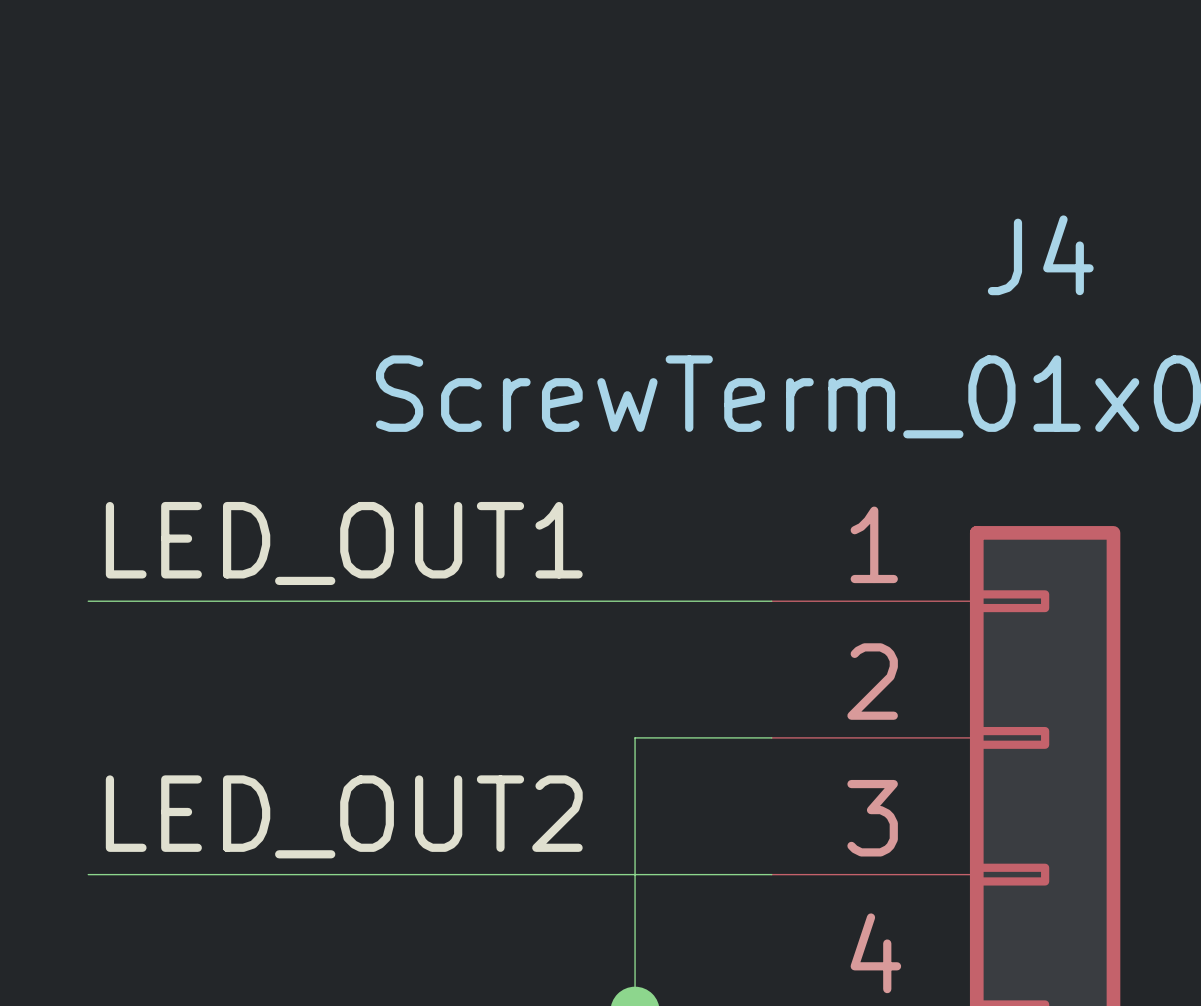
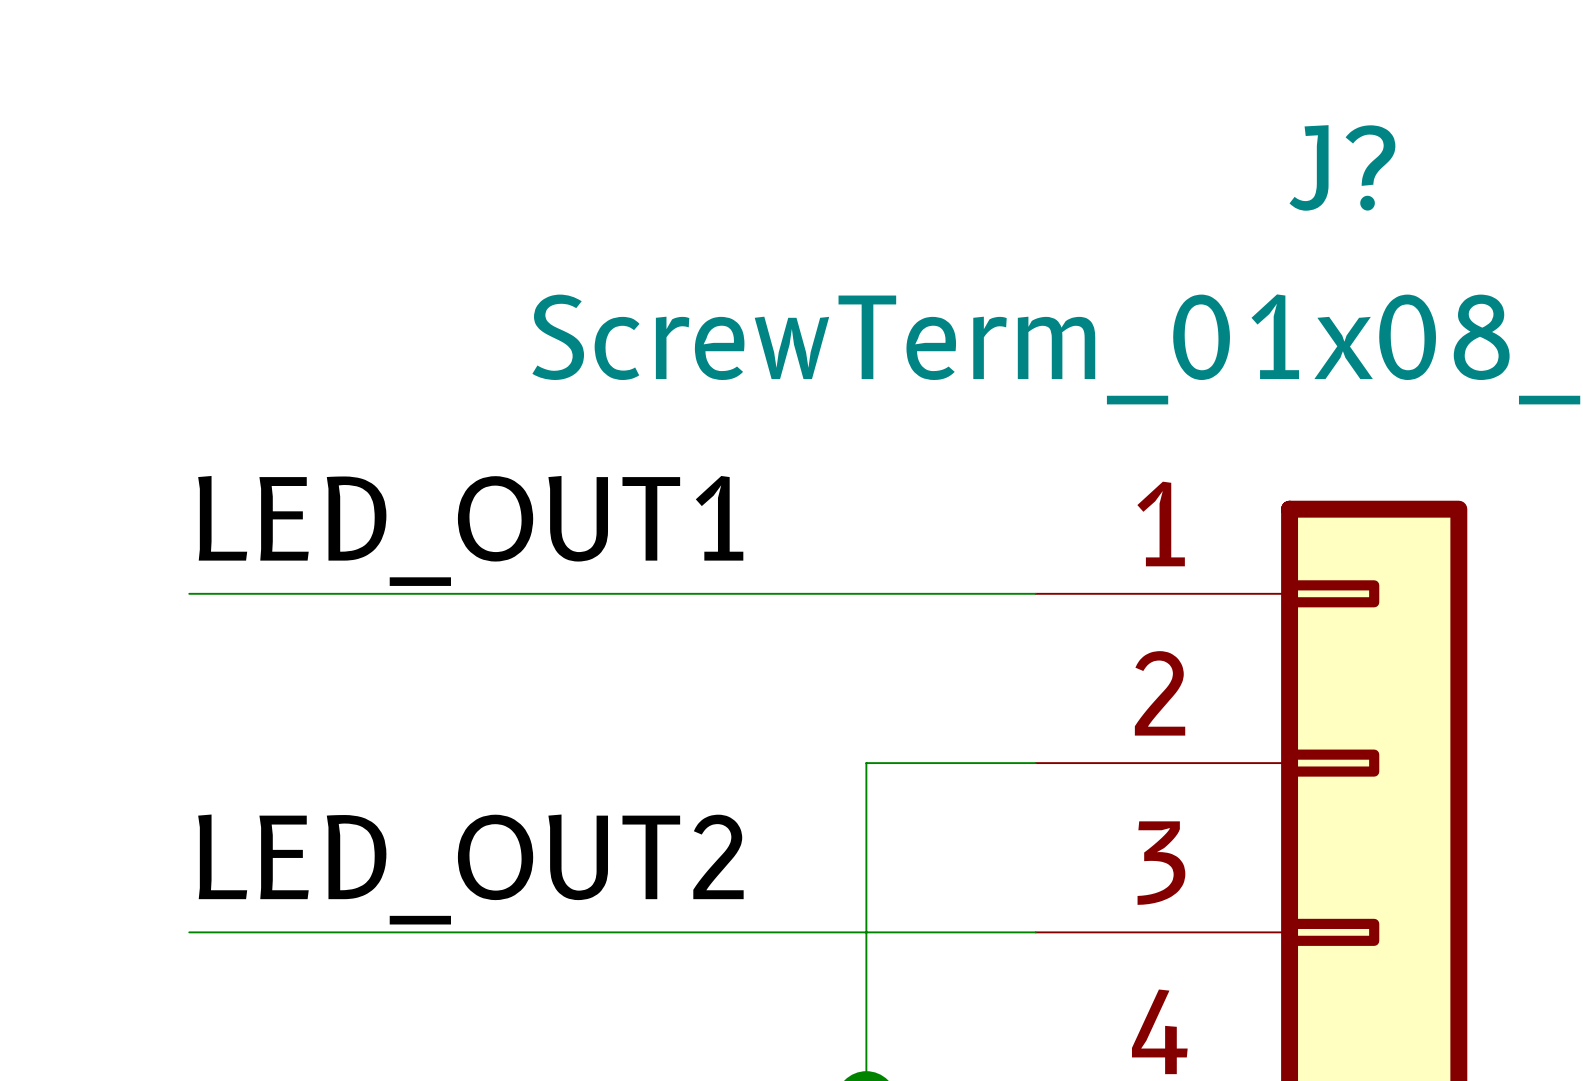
J4 name: J4 (1040, 255) -> J? (1342, 167)

